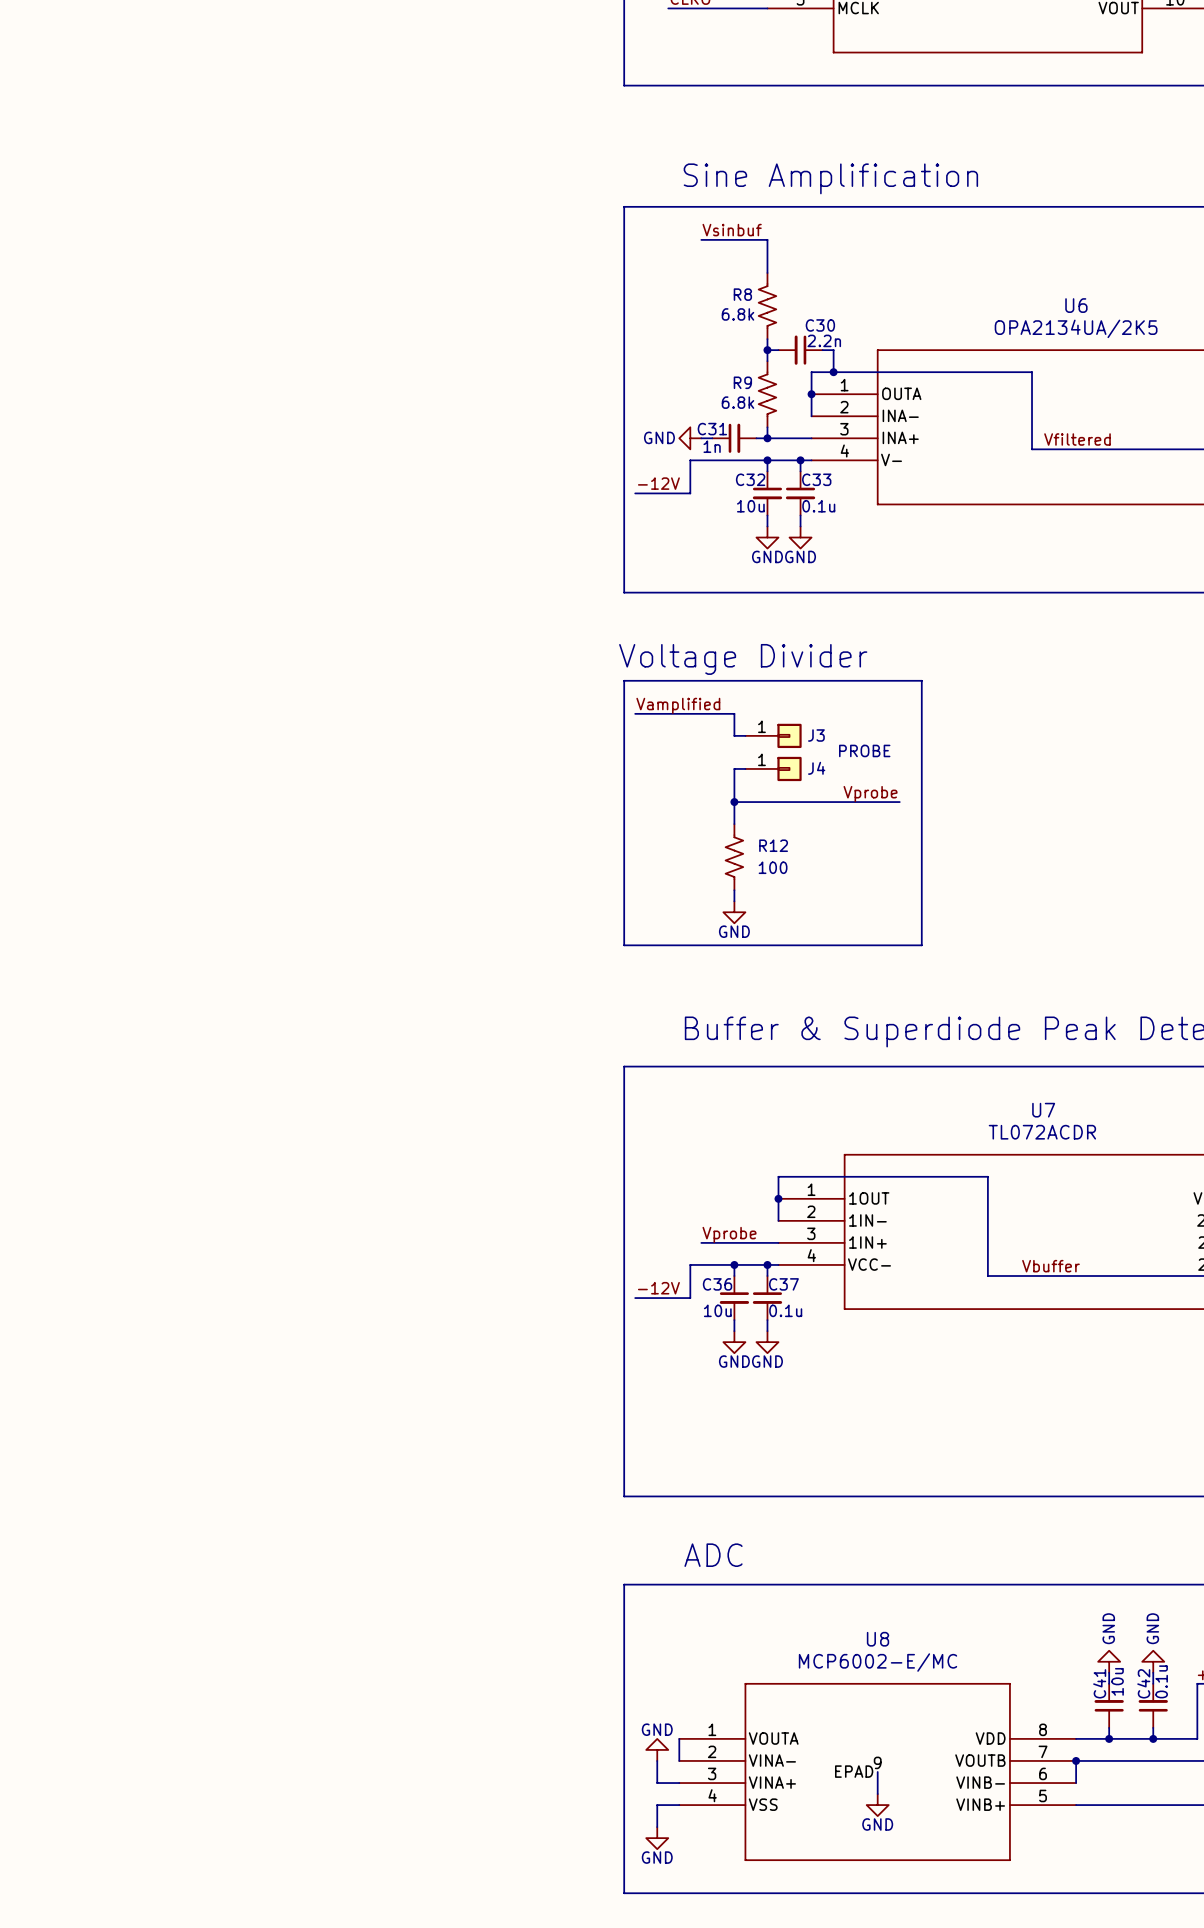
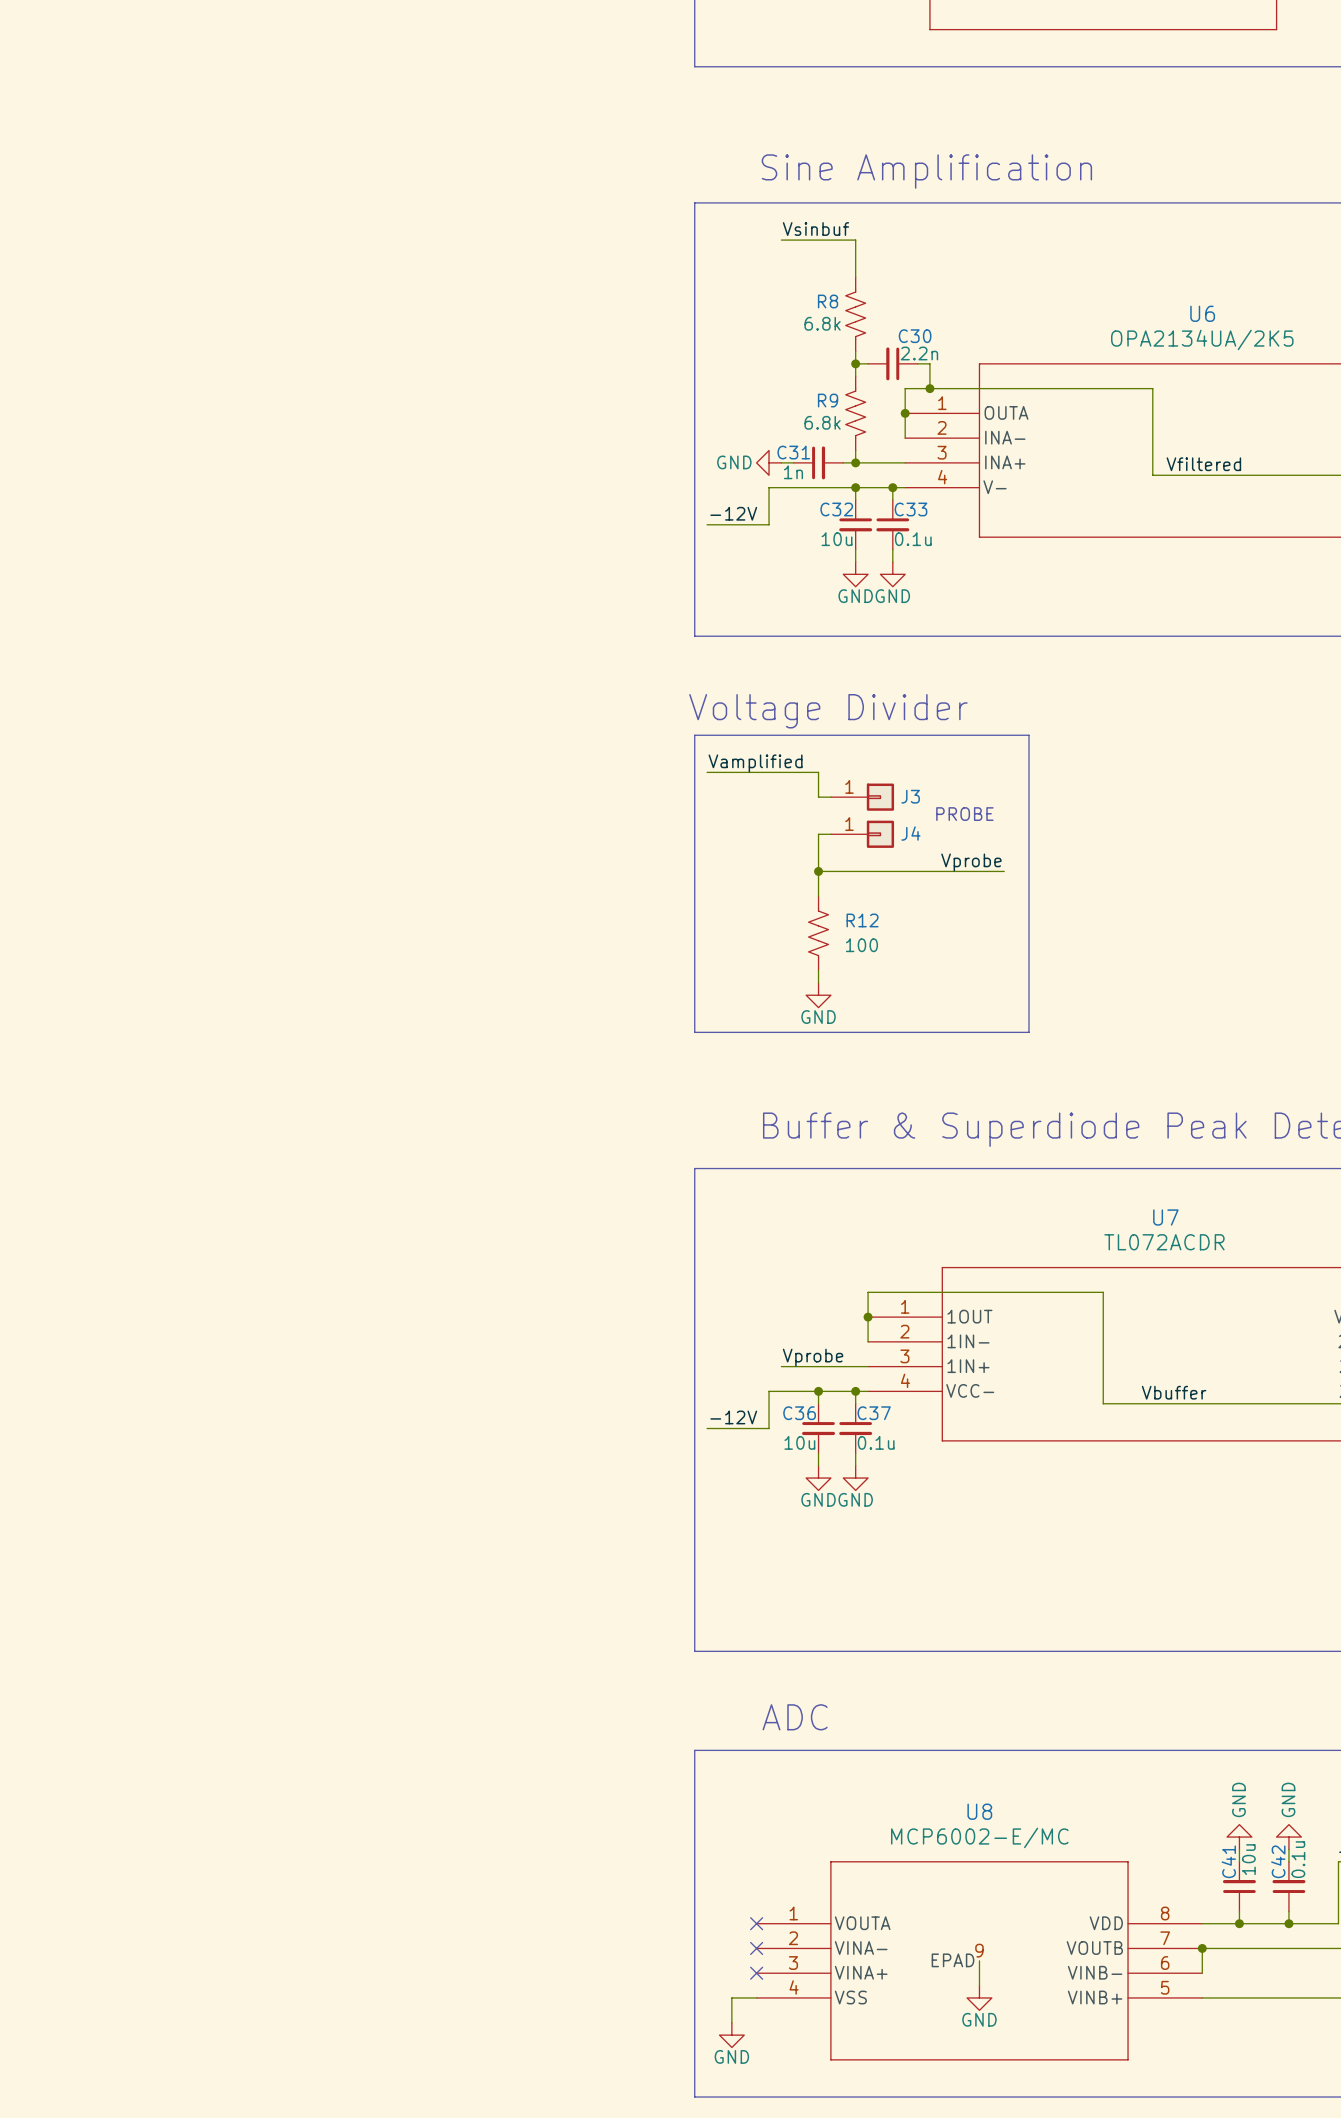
wire: (679, 1738) (679, 1760) -> none
no-connect mark: none -> (756, 1923)
power symbol: GND (657, 1749) -> none
wire: (657, 1760) (657, 1783) (679, 1783) -> none
no-connect mark: none -> (756, 1948)
no-connect mark: none -> (756, 1973)

